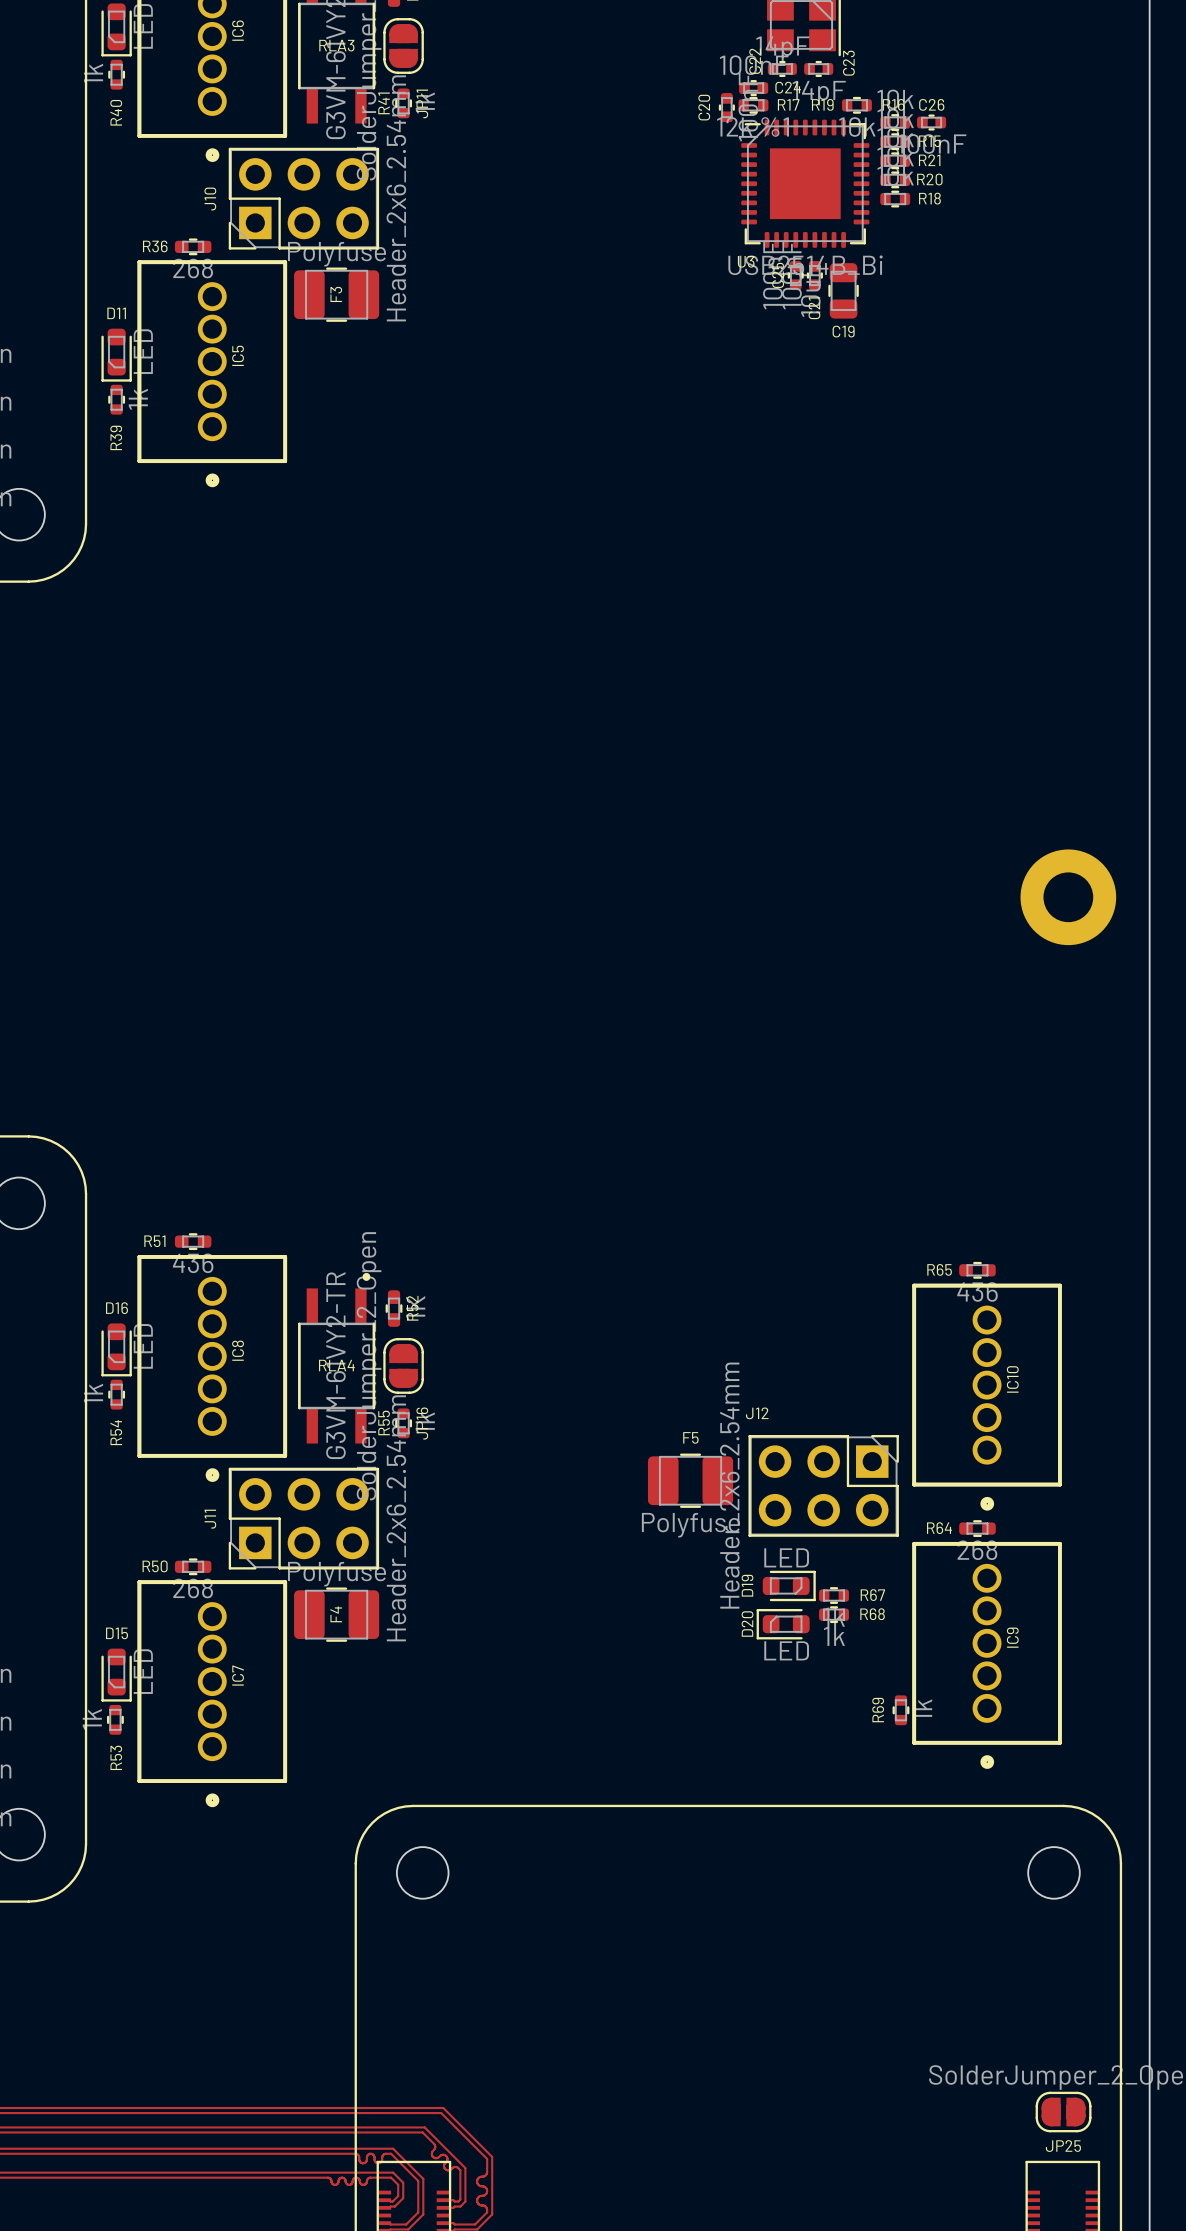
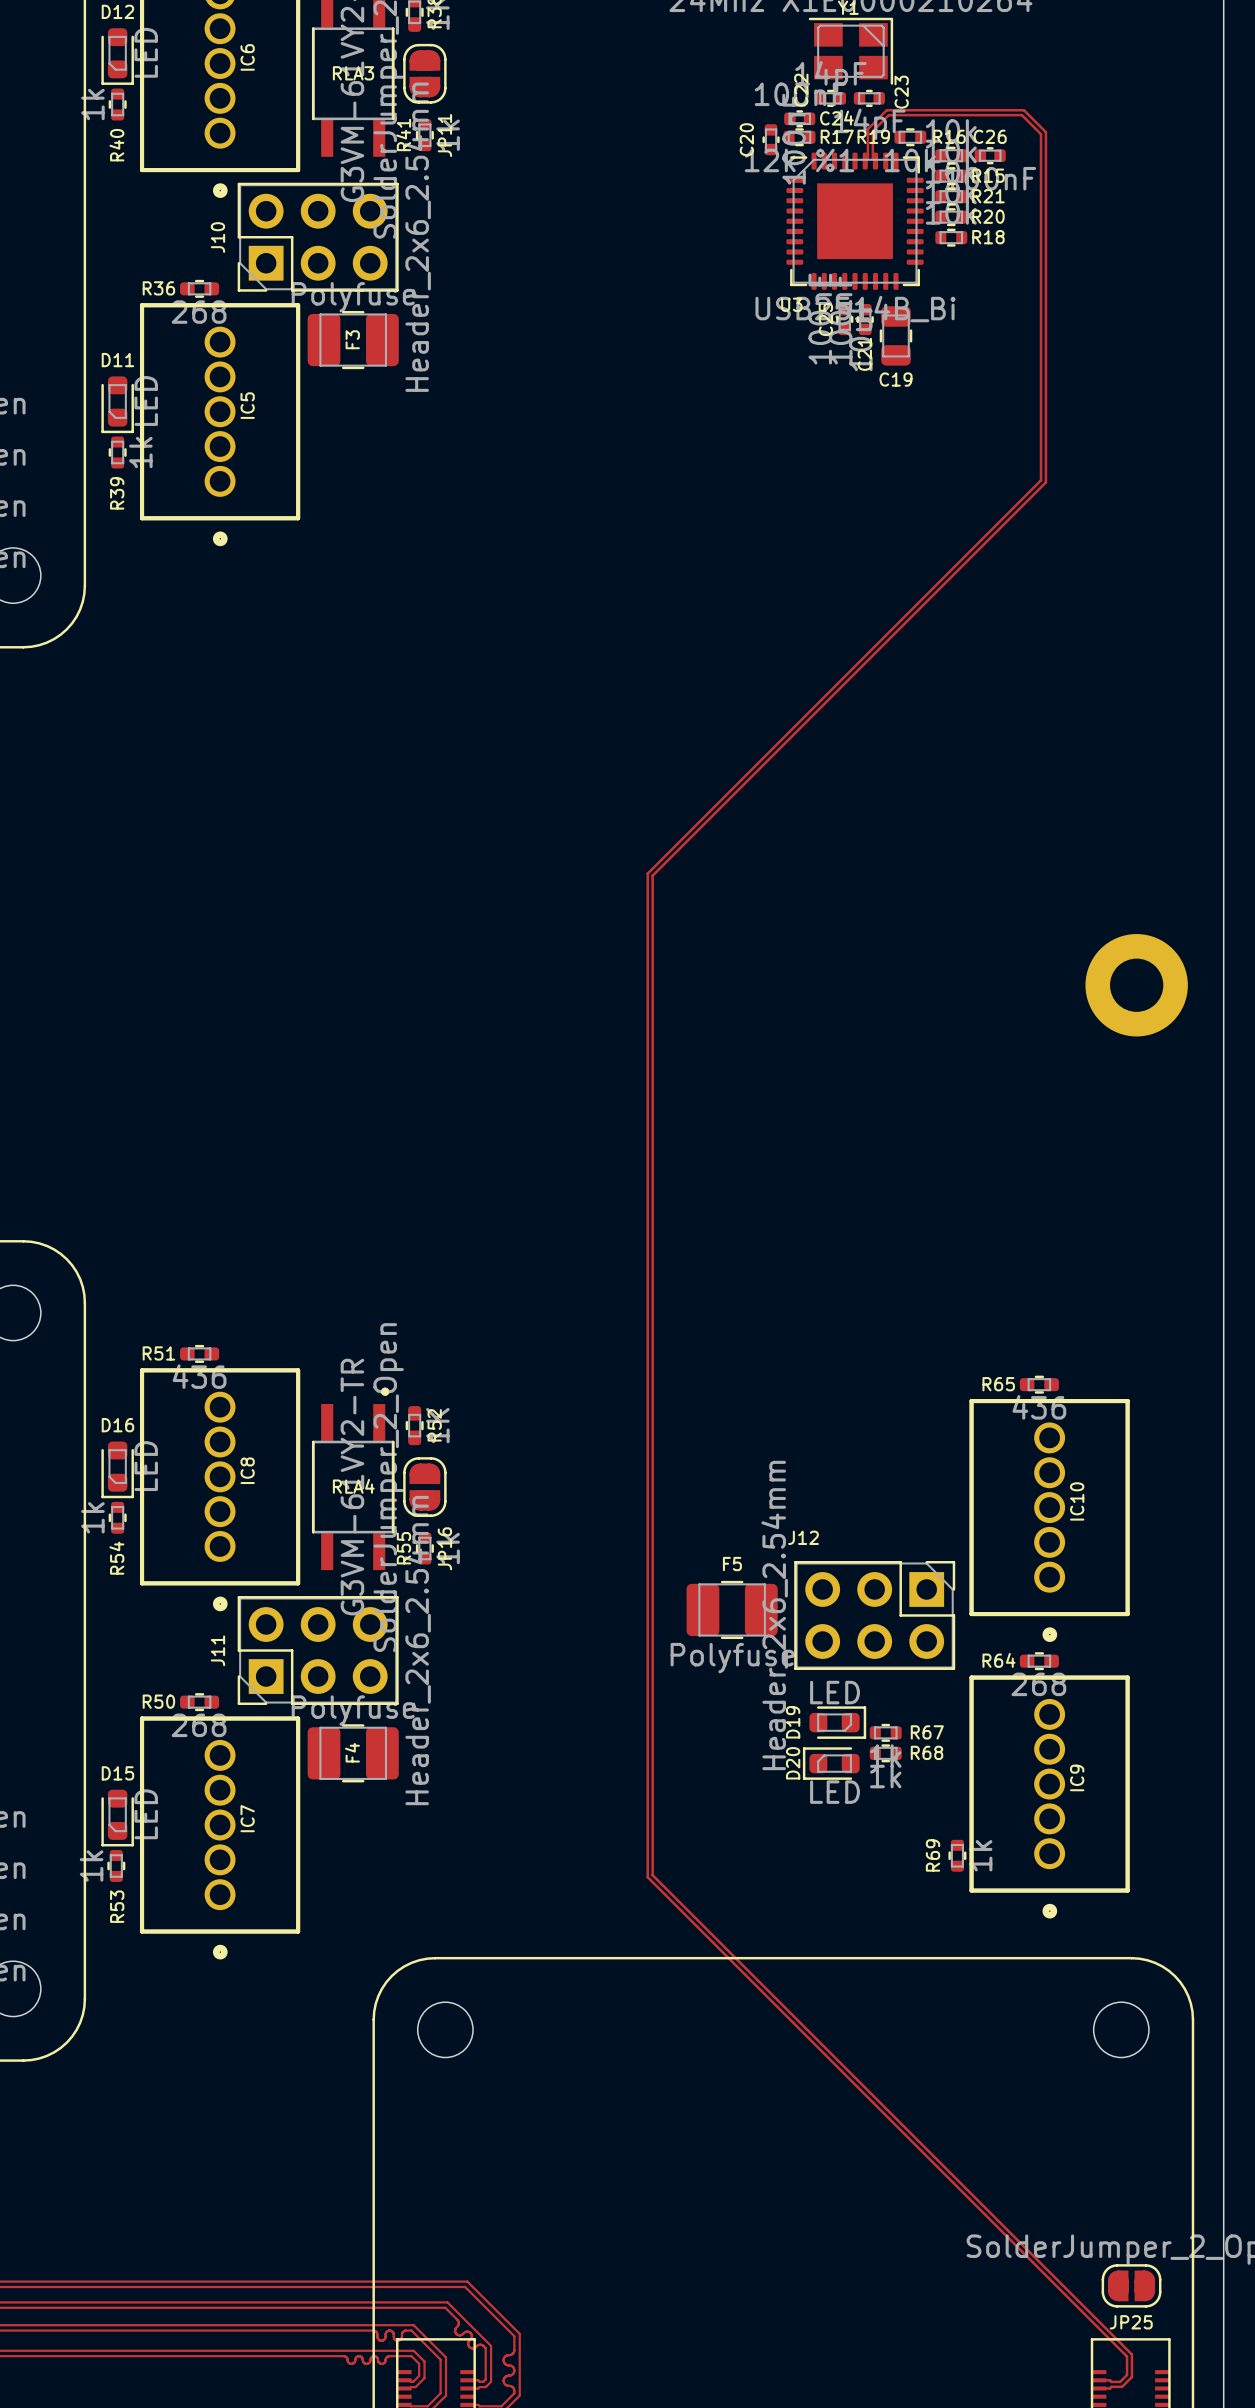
top track: none -> (865, 161) (867, 158) (867, 129) (886, 110) (1024, 110) (1045, 132) (1045, 482) (652, 875) (652, 1875) (1131, 2354) (1131, 2377) (1122, 2386) (1099, 2388)
top track: none -> (875, 161) (872, 158) (872, 131) (888, 115) (1021, 115) (1041, 134) (1041, 480) (647, 873) (647, 1877) (1127, 2356) (1127, 2374) (1120, 2381) (1099, 2380)

